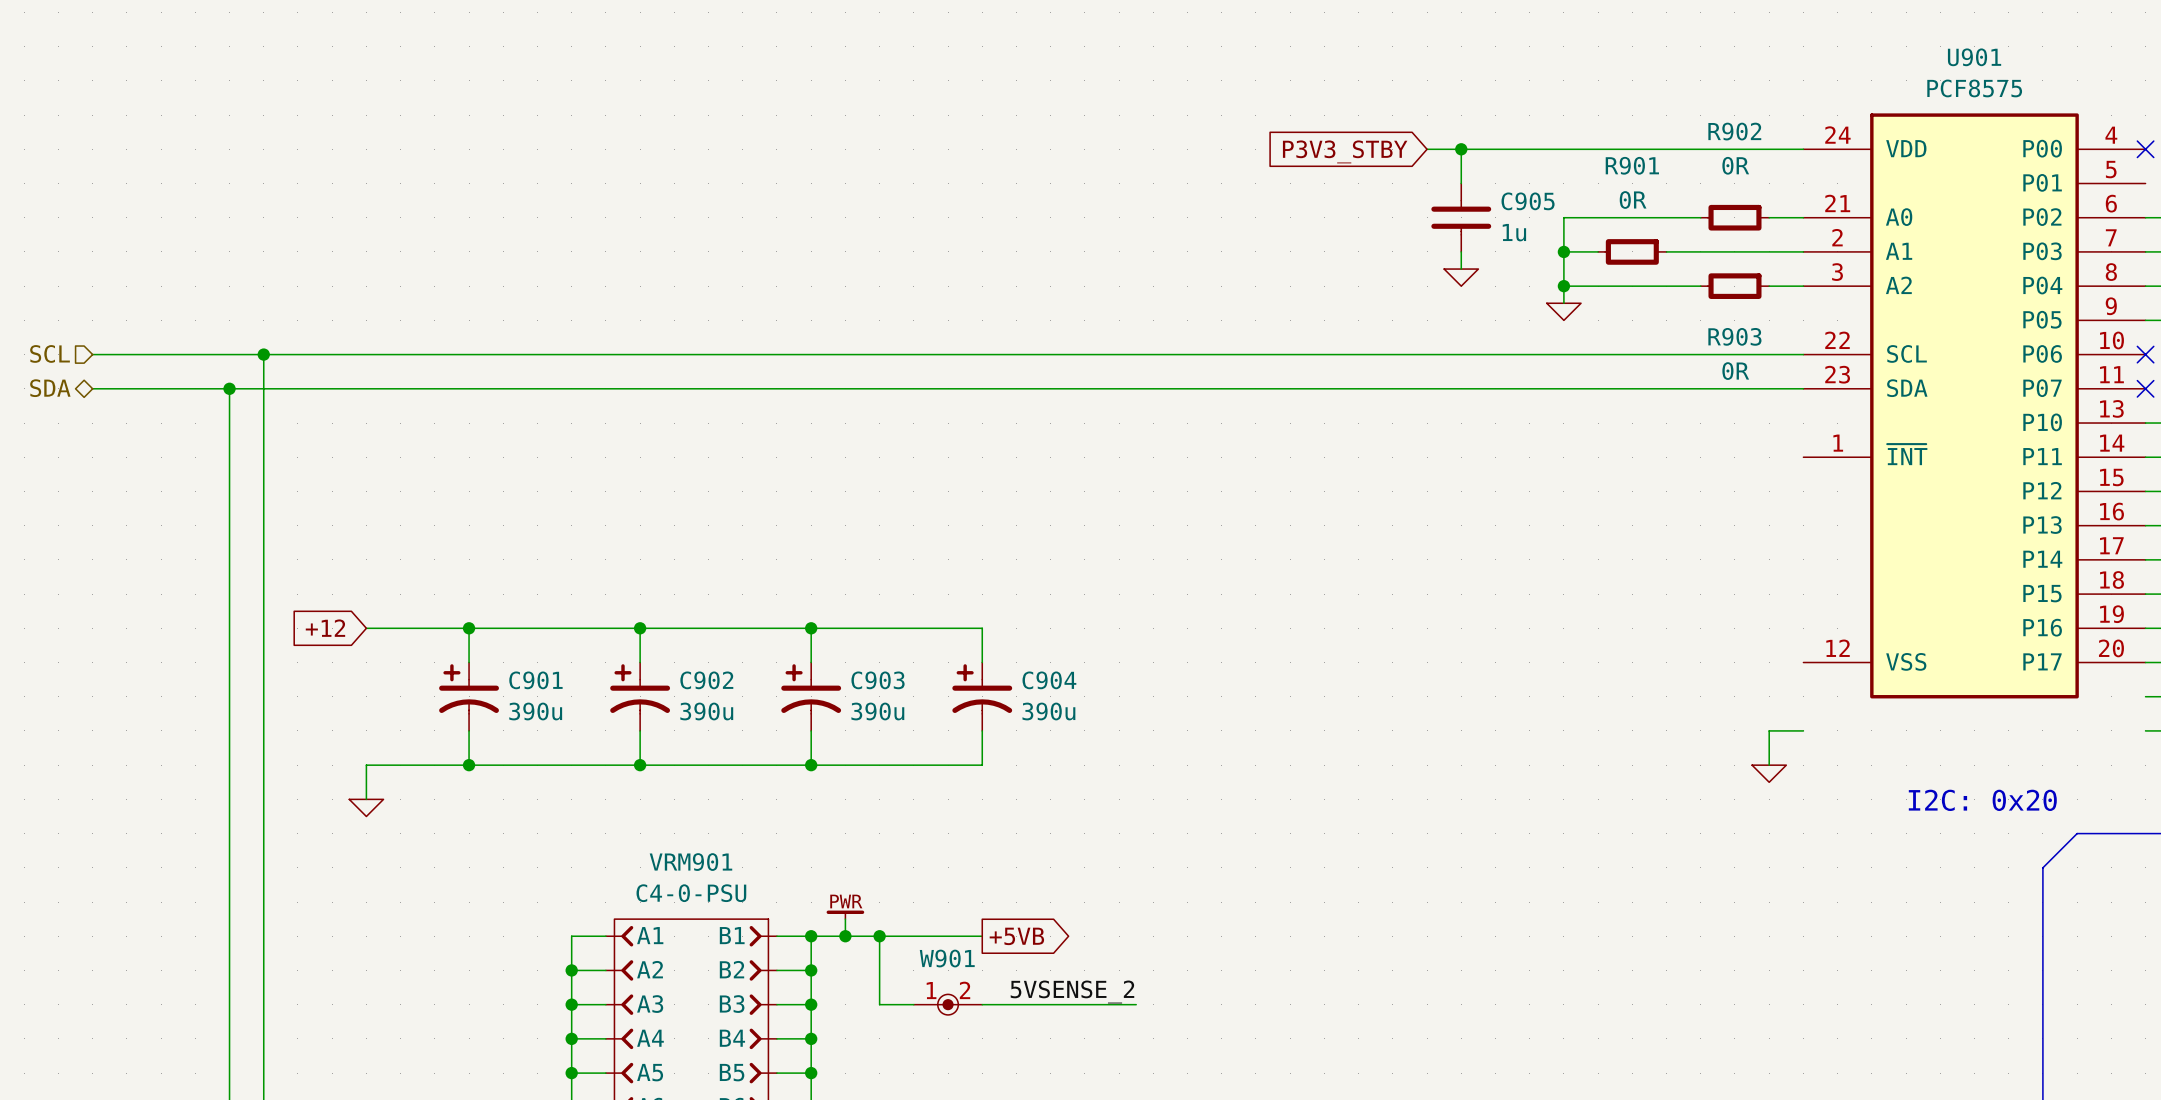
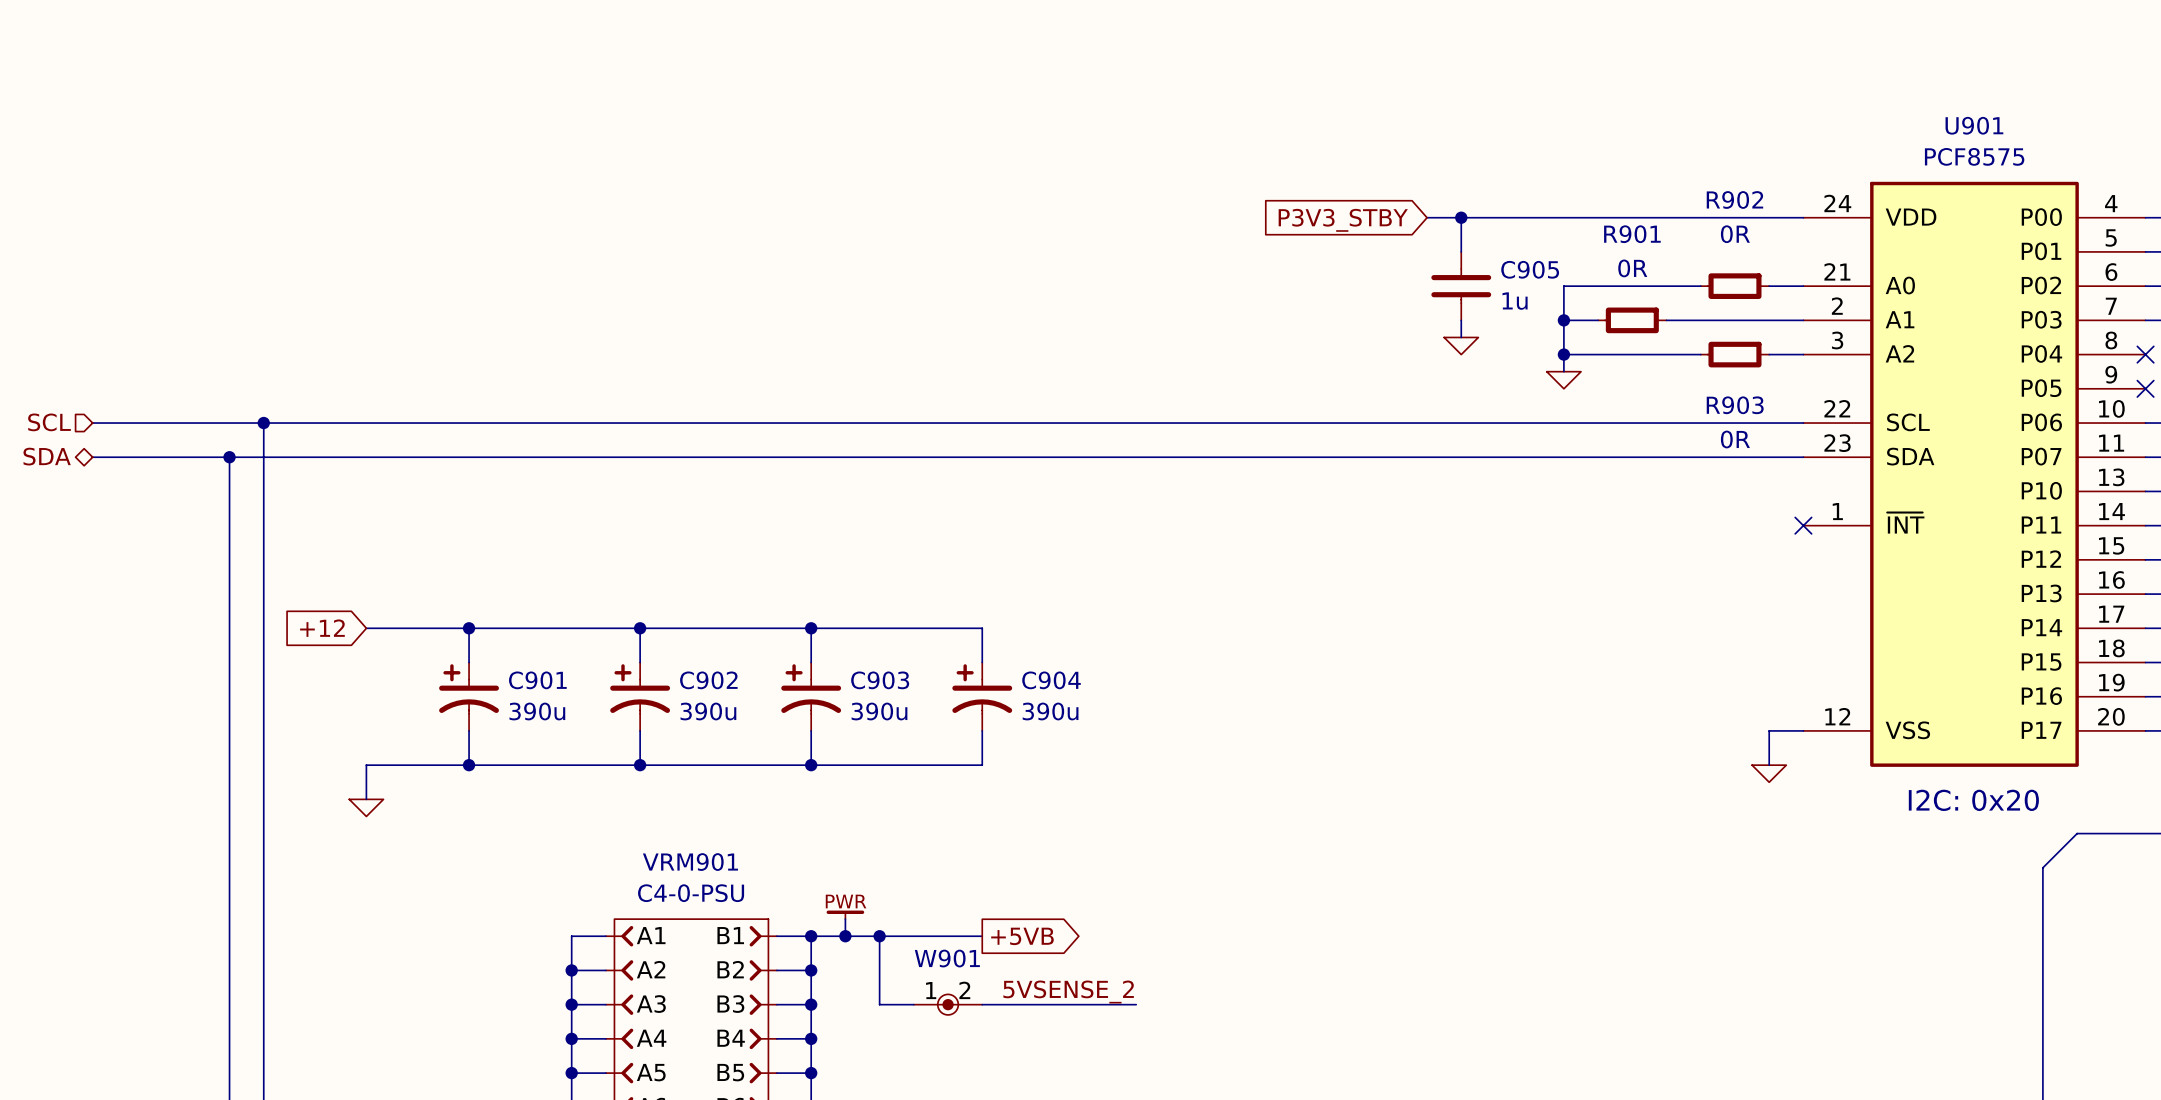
wire: (1427, 149) (1803, 149) -> none
wire: (1461, 149) (1461, 183) -> none
junction: (1461, 149) -> none
no-connect mark: (2145, 149) -> none
global label position: P3V3_STBY (1345, 151) -> P3V3_STBY (1343, 220)
C905 position: (1461, 217) -> (1461, 286)
junction: none -> (1461, 217)
wire: (1563, 217) (1563, 286) -> (1563, 217) (1427, 217)
R902: 0R (1734, 217) -> none
wire: (1563, 251) (1598, 251) -> (1563, 320) (1598, 320)
junction: (1563, 251) -> none
R901 position: (1632, 251) -> (1632, 320)
wire: (1666, 251) (1803, 251) -> (1666, 320) (1803, 320)
power symbol: (1461, 277) -> none
junction: (1563, 286) -> none
wire: none -> (1563, 303) (1563, 371)
power symbol: (1563, 311) -> none
wire: none -> (1461, 320) (1461, 337)
junction: none -> (1563, 320)
R903 name: R903 (1734, 336) -> R902 (1734, 199)
power symbol: none -> (1461, 346)
hierarchical label position: SCL (50, 353) -> SCL (49, 422)
wire: (92, 354) (1563, 354) -> none
wire: (263, 354) (263, 423) -> none
junction: (263, 354) -> none
junction: none -> (1563, 354)
wire: (1700, 354) (1769, 354) -> (1700, 217) (1769, 217)
R903: none -> 0R (1734, 354)
R903 value position: 0R (1735, 371) -> 0R (1735, 234)
power symbol: none -> (1563, 380)
hierarchical label position: SDA (50, 388) -> SDA (47, 456)
wire: (92, 388) (1803, 388) -> (92, 457) (1803, 457)
wire: (229, 388) (229, 457) -> none
junction: (229, 388) -> none
U901 position: (1974, 405) -> (1974, 474)
wire: none -> (92, 423) (1803, 423)
junction: none -> (263, 423)
junction: none -> (229, 457)
no-connect mark: none -> (1803, 525)

